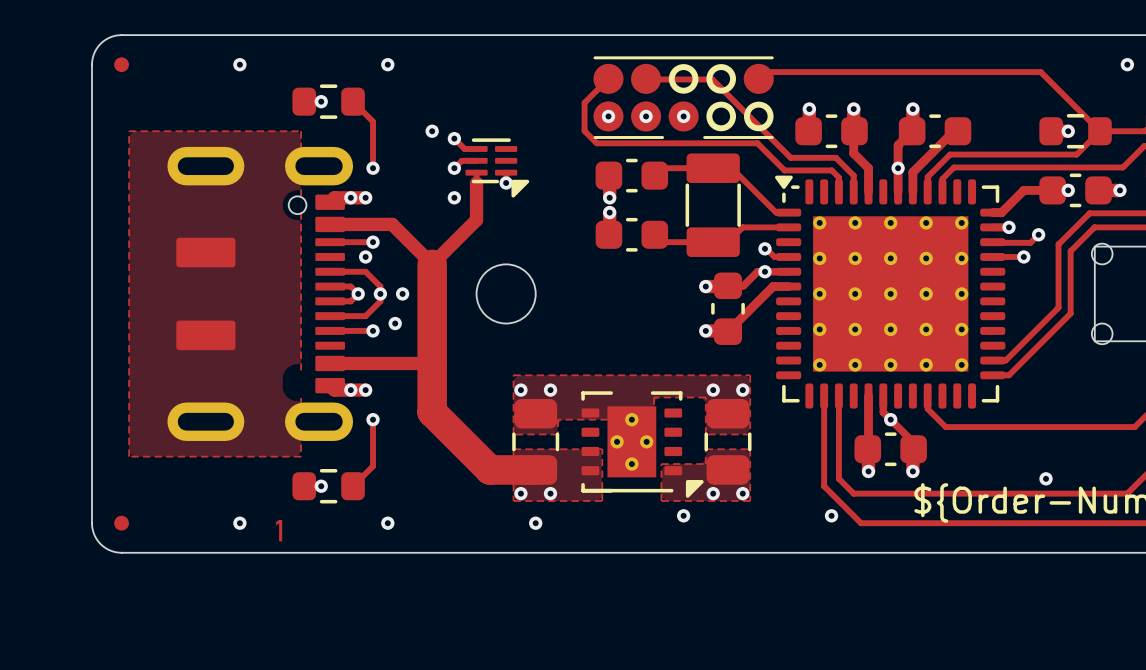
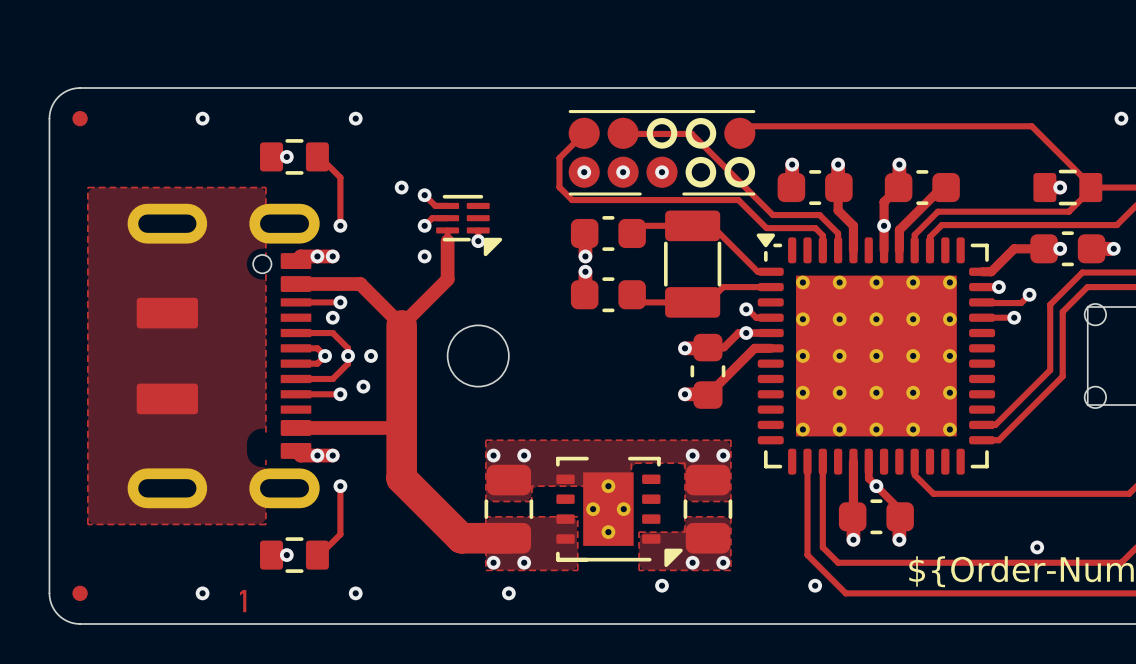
part footprint: [292, 84, 365, 119] -> [260, 139, 329, 175]
part footprint: [1039, 114, 1112, 149] -> [1033, 169, 1103, 206]
part footprint: [292, 469, 365, 504] -> [260, 537, 329, 573]

